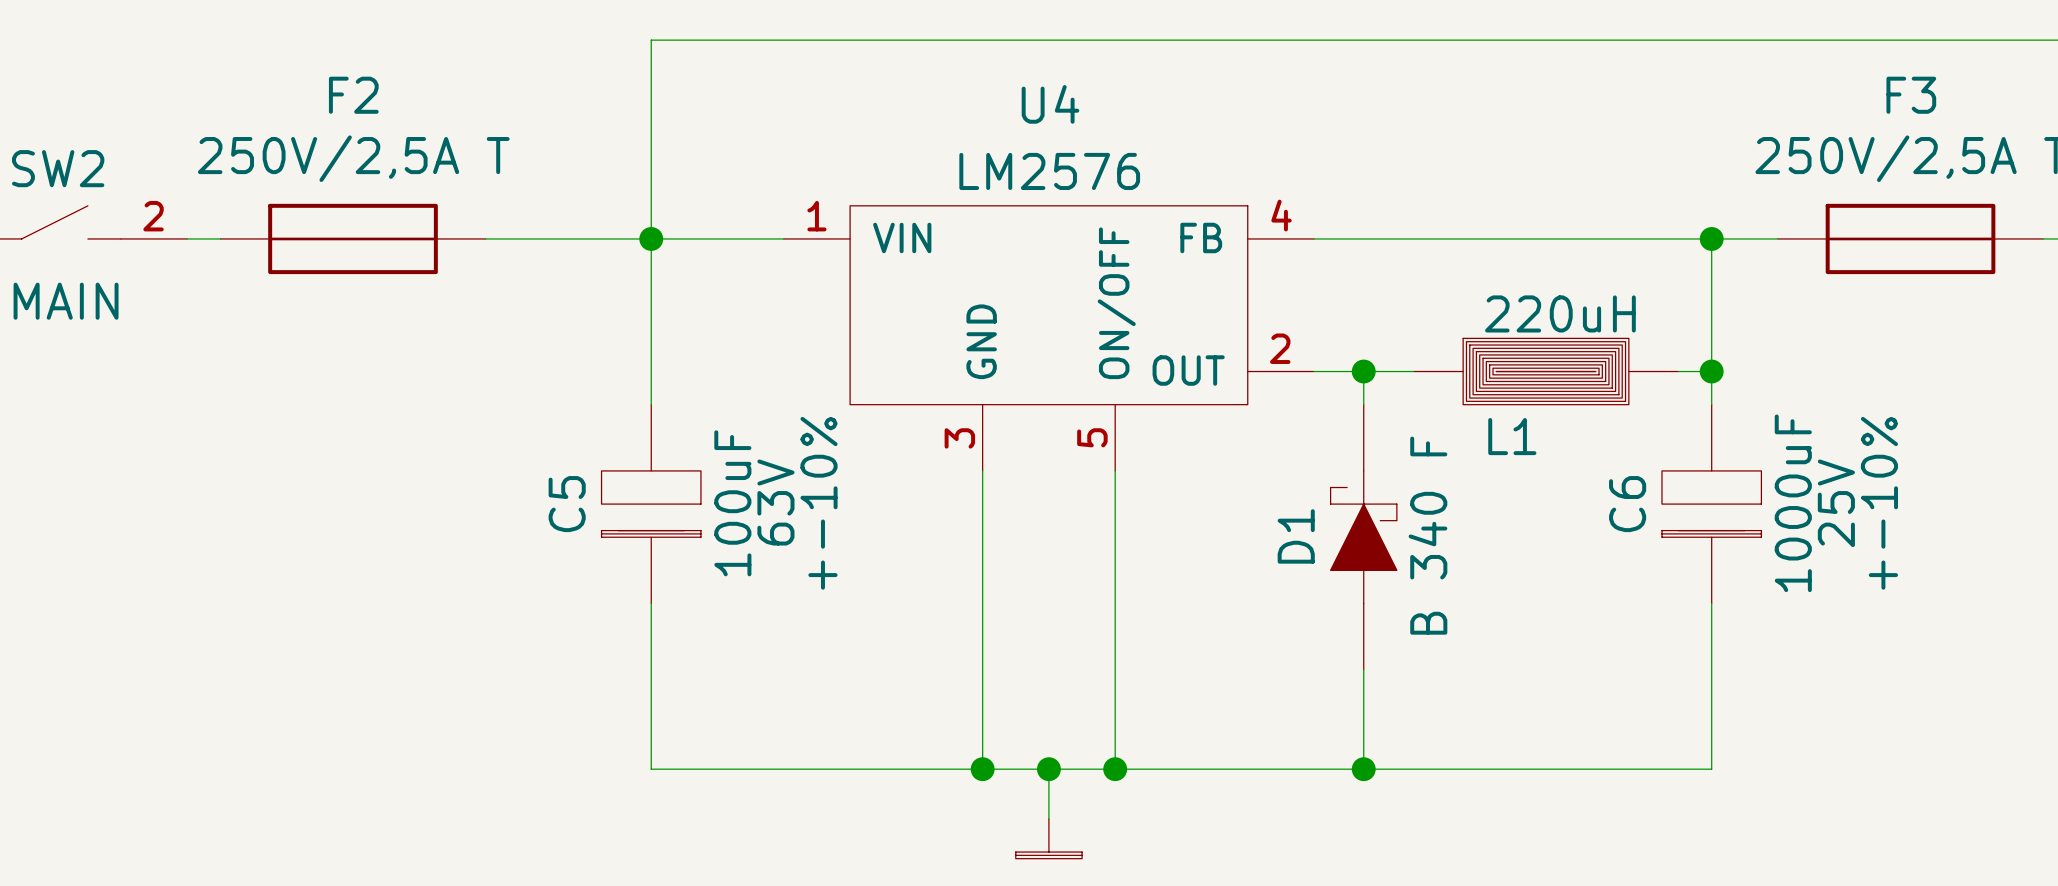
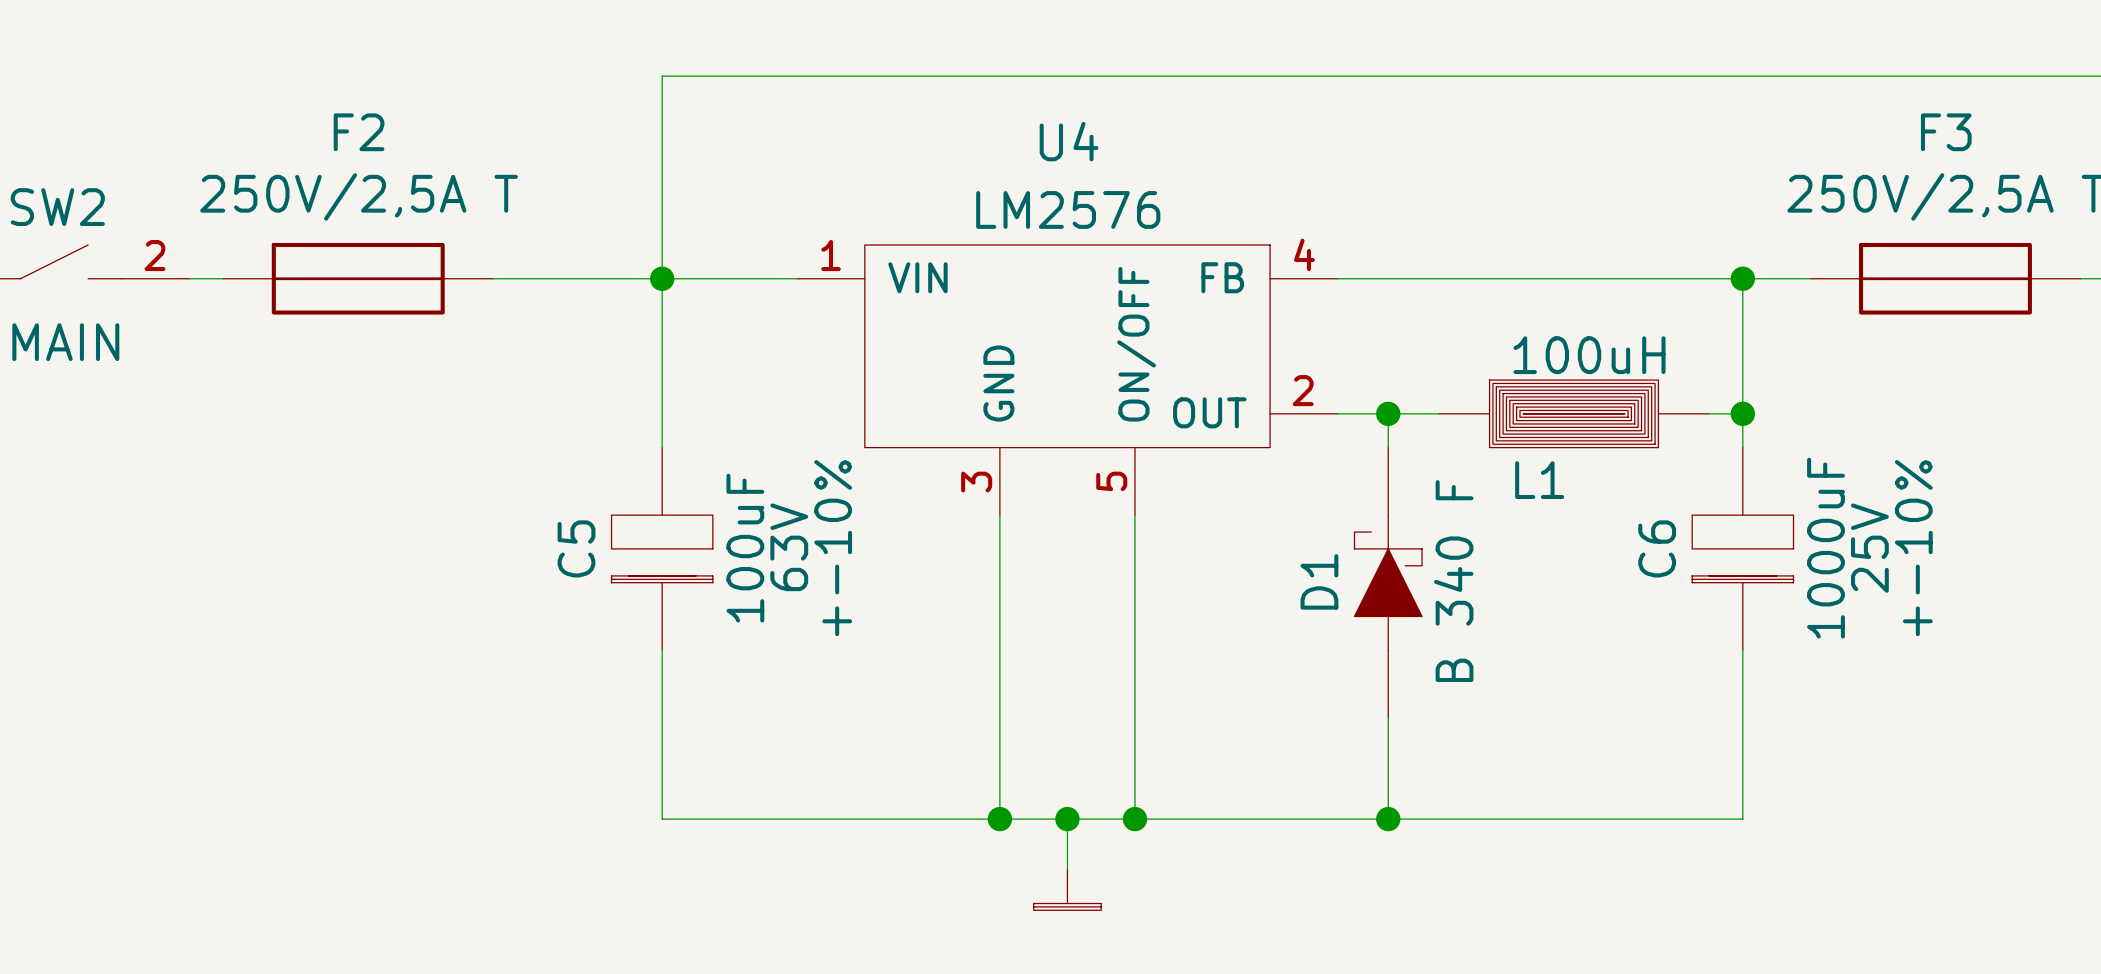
L1 value: 220uH (1560, 313) -> 100uH (1589, 355)

